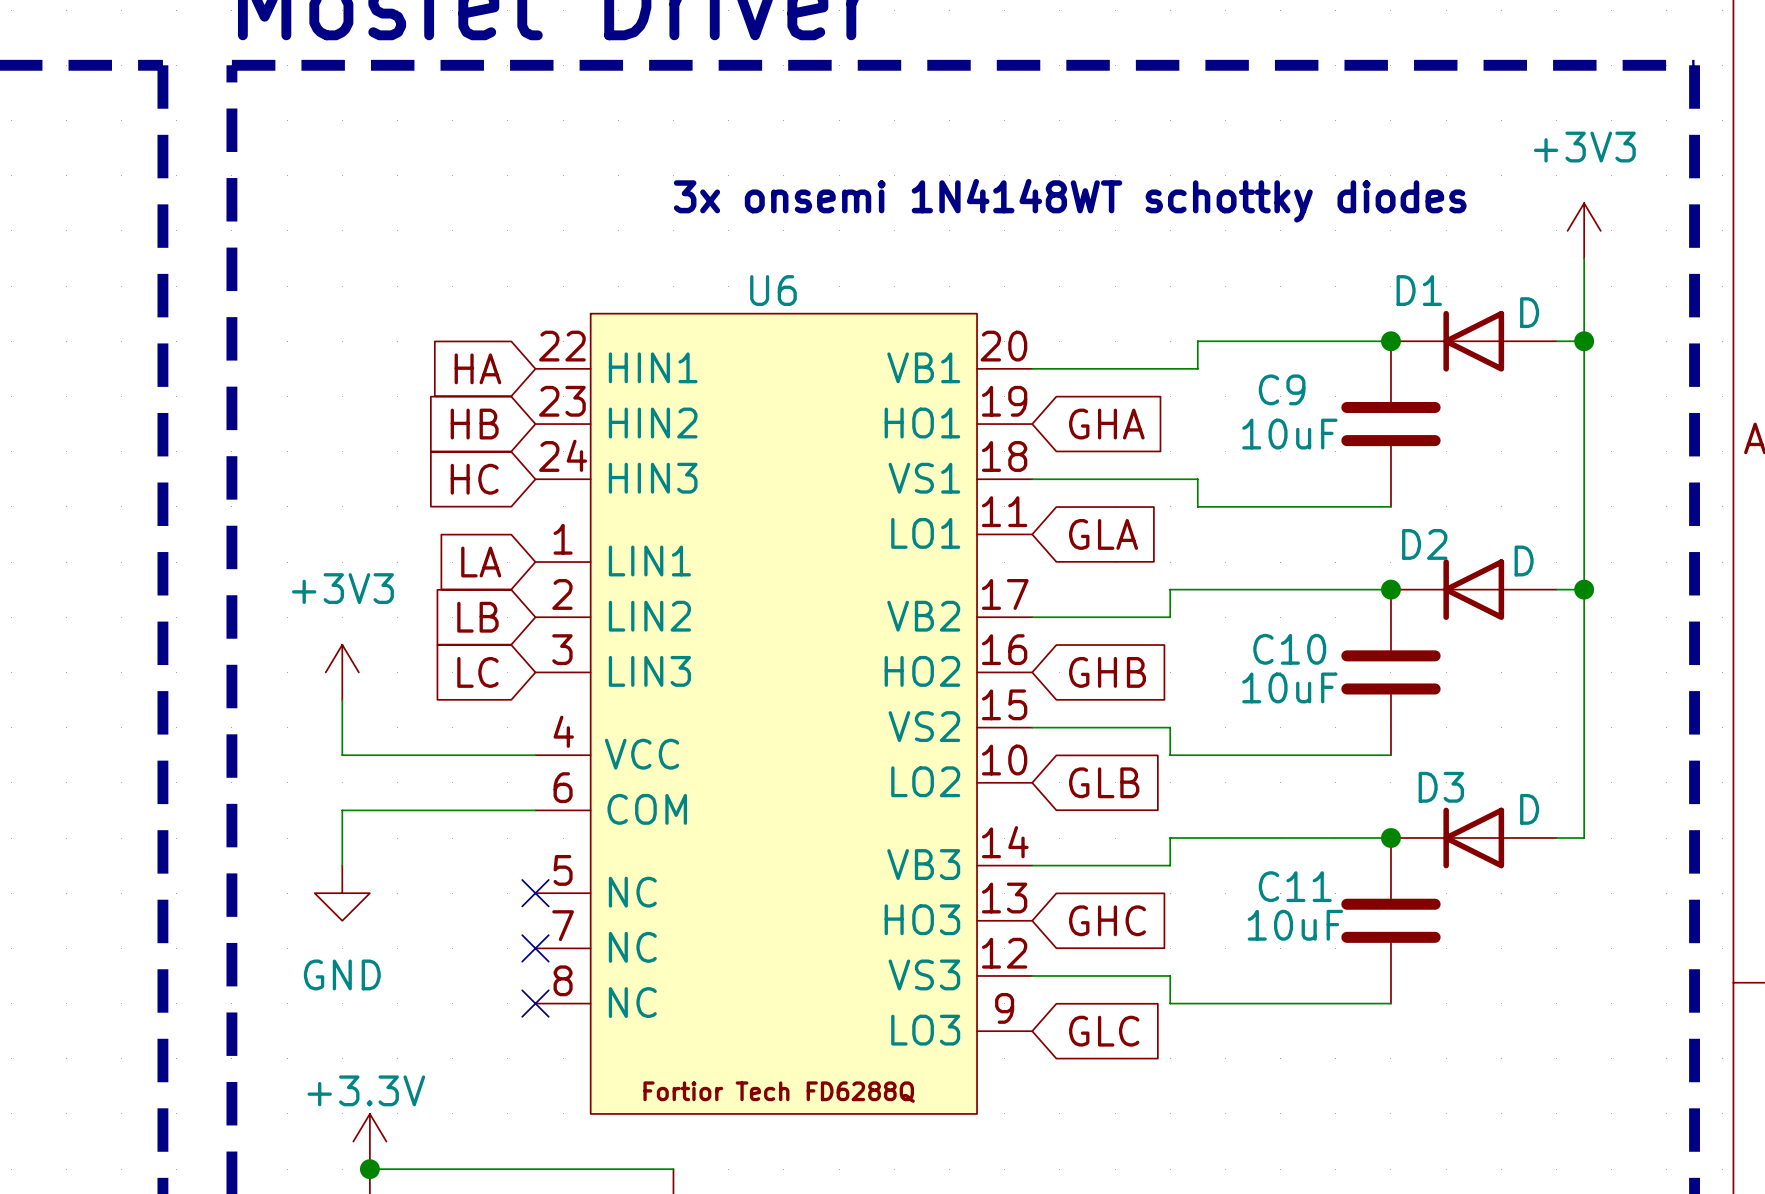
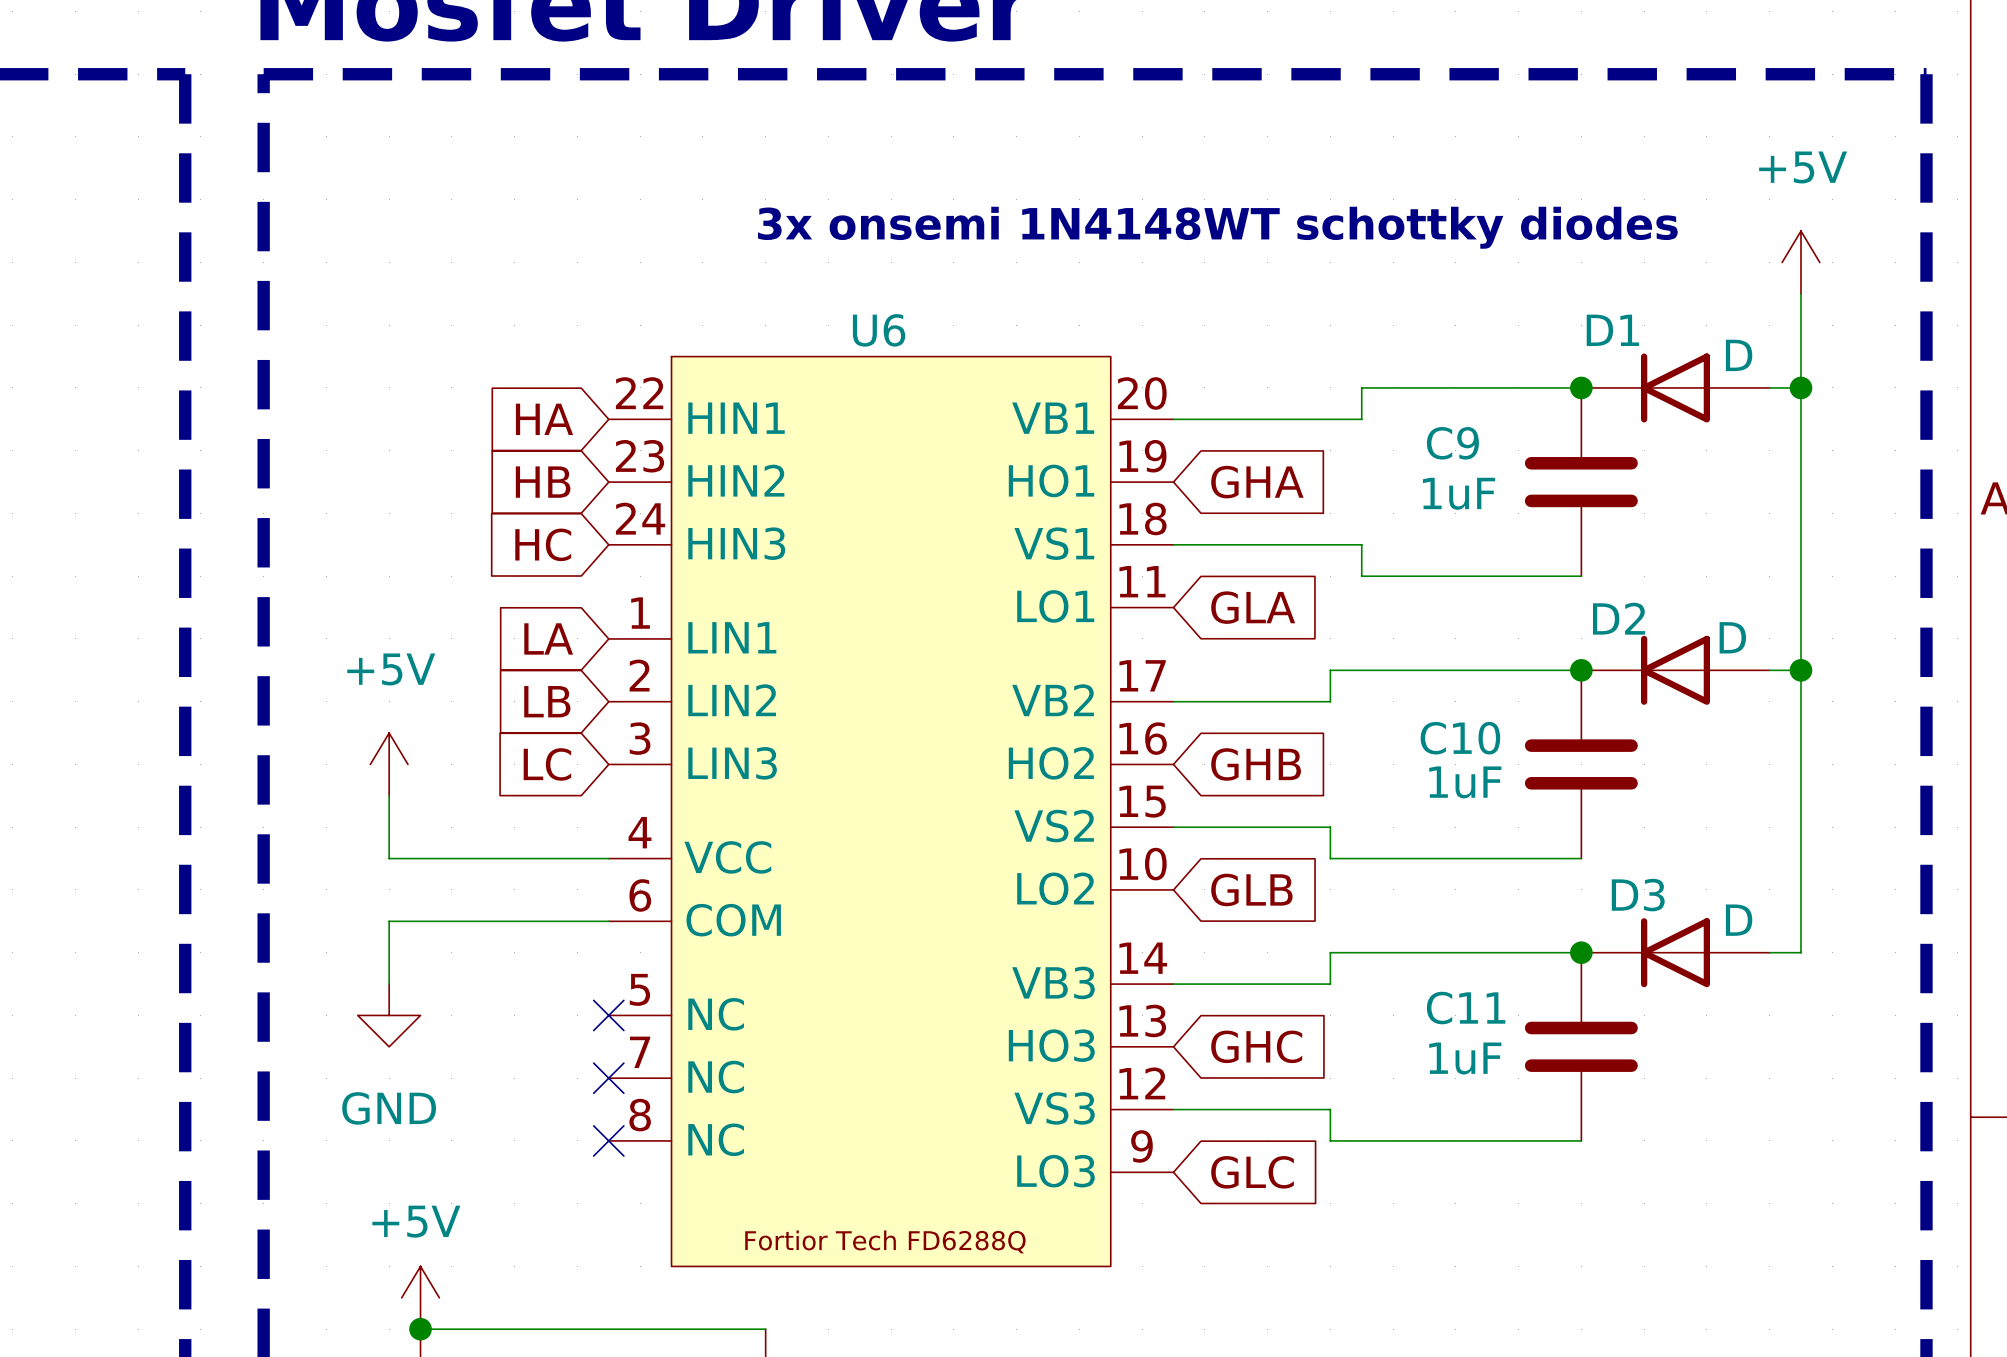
power symbol: +3V3 (1584, 230) -> +5V (1800, 262)
C9 value: 10uF (1289, 434) -> 1uF (1459, 493)
power symbol: +3V3 (342, 672) -> +5V (389, 764)
C10 value: 10uF (1289, 687) -> 1uF (1465, 782)
C11 value: 10uF (1295, 925) -> 1uF (1465, 1058)
power symbol: +3.3V (369, 1141) -> +5V (420, 1297)

